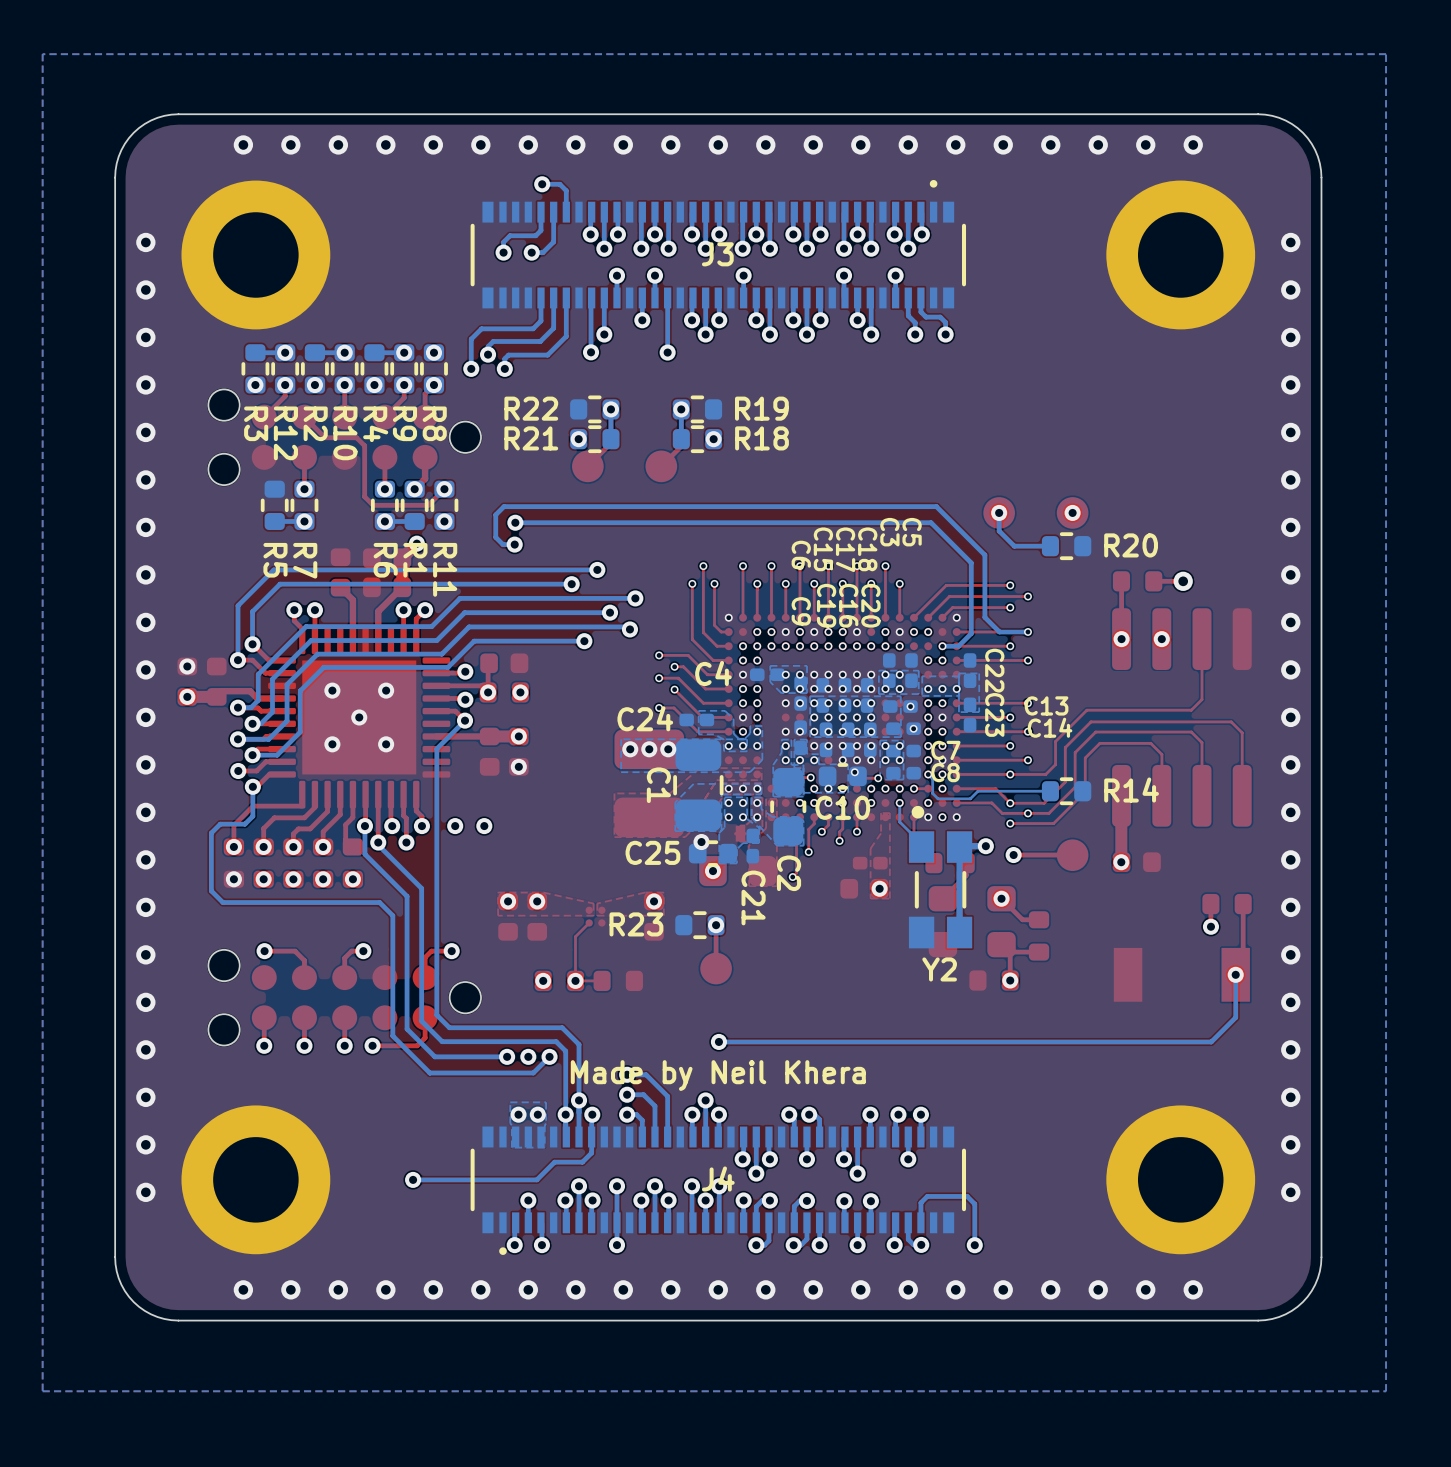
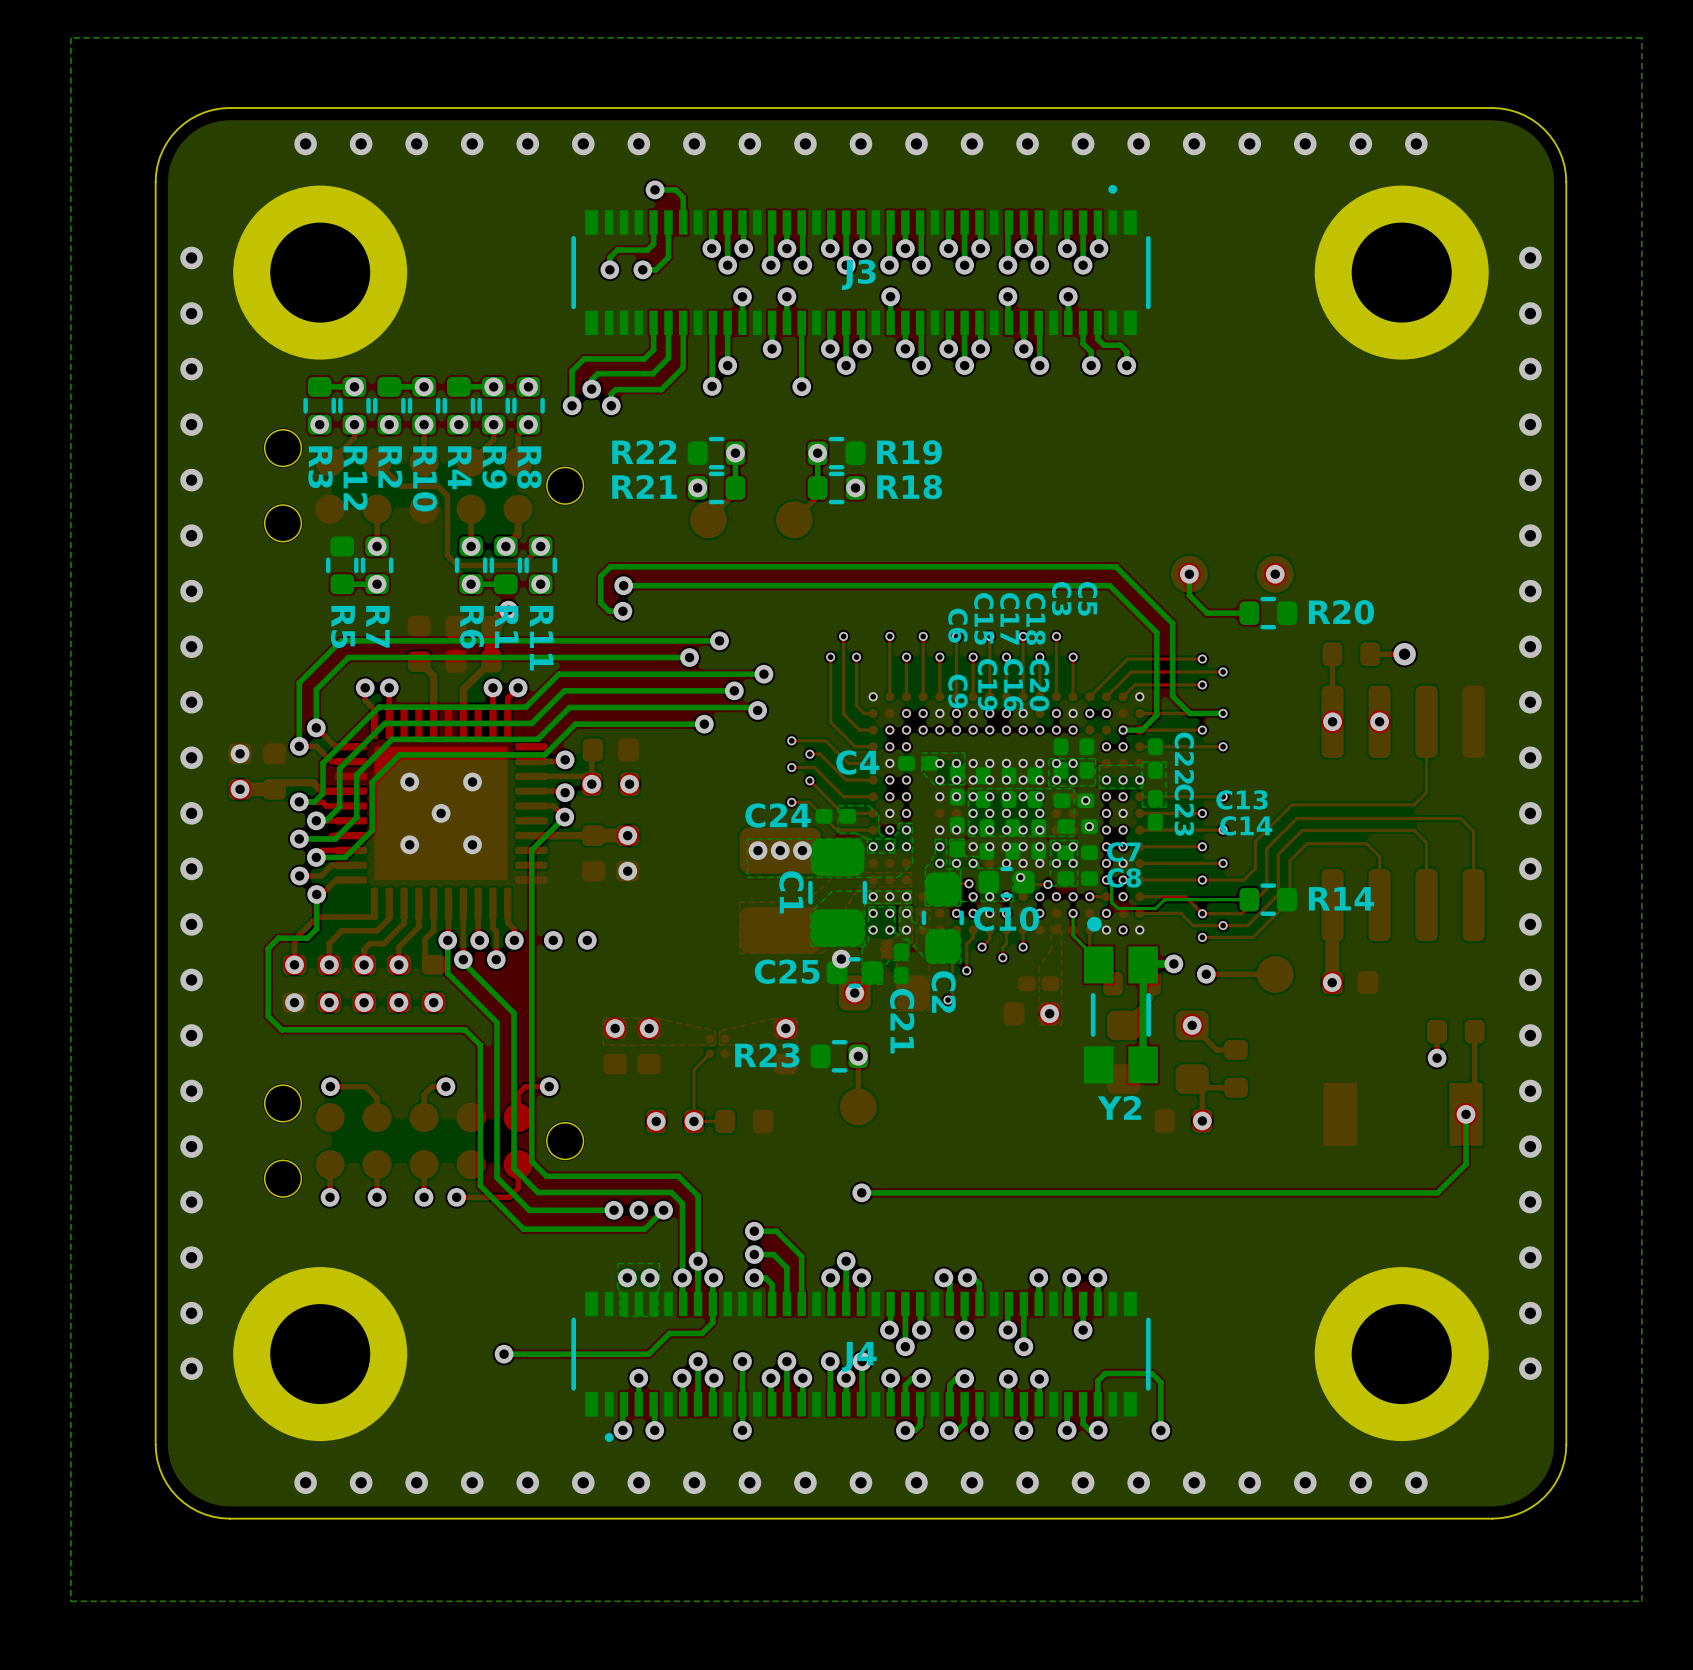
text: Made by Neil Khera (718, 1075) -> none

